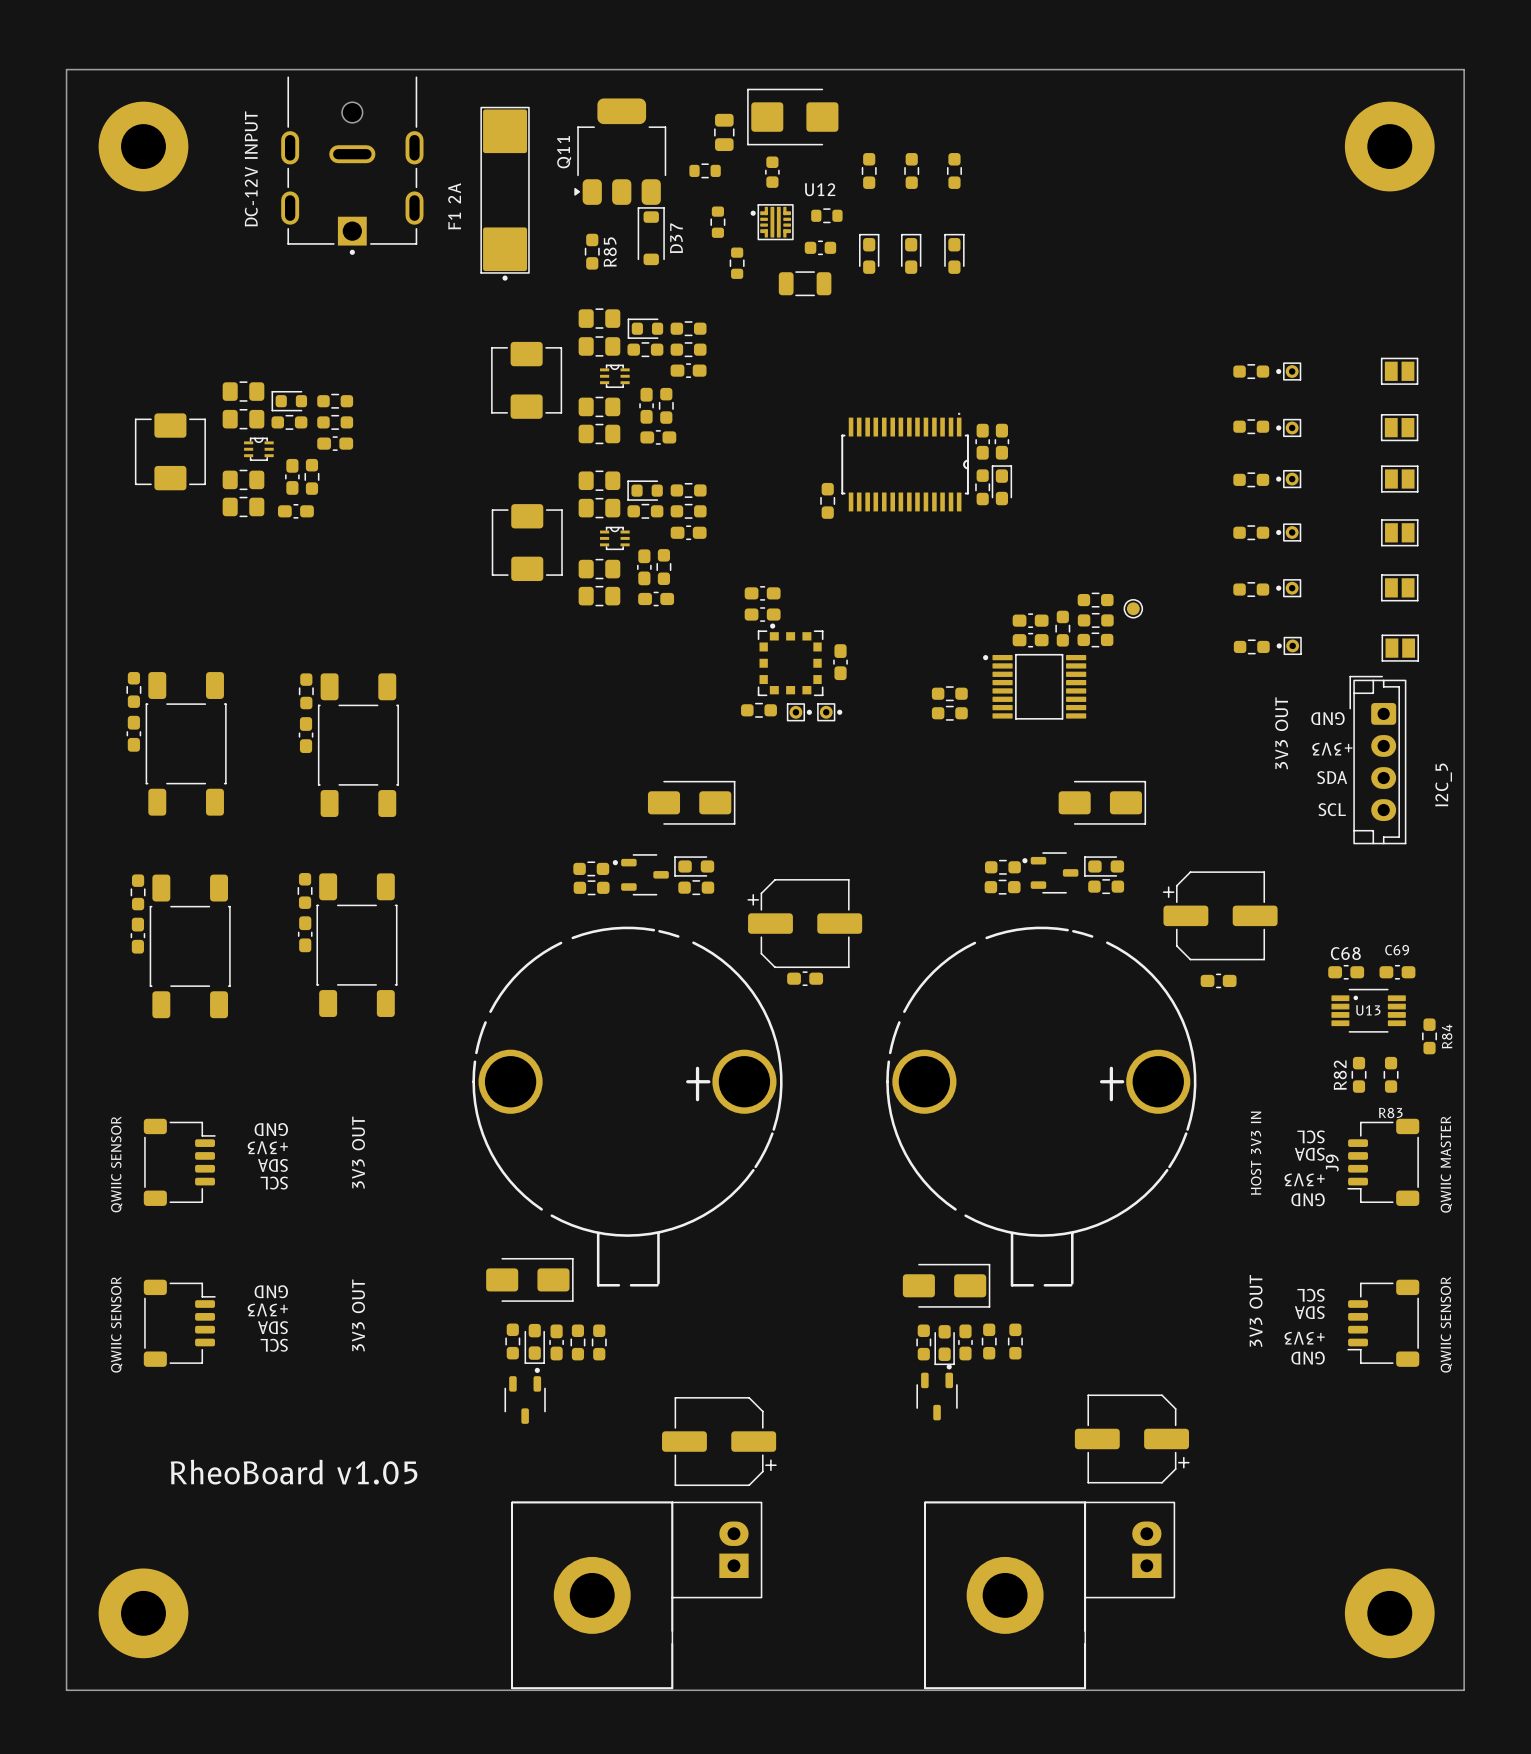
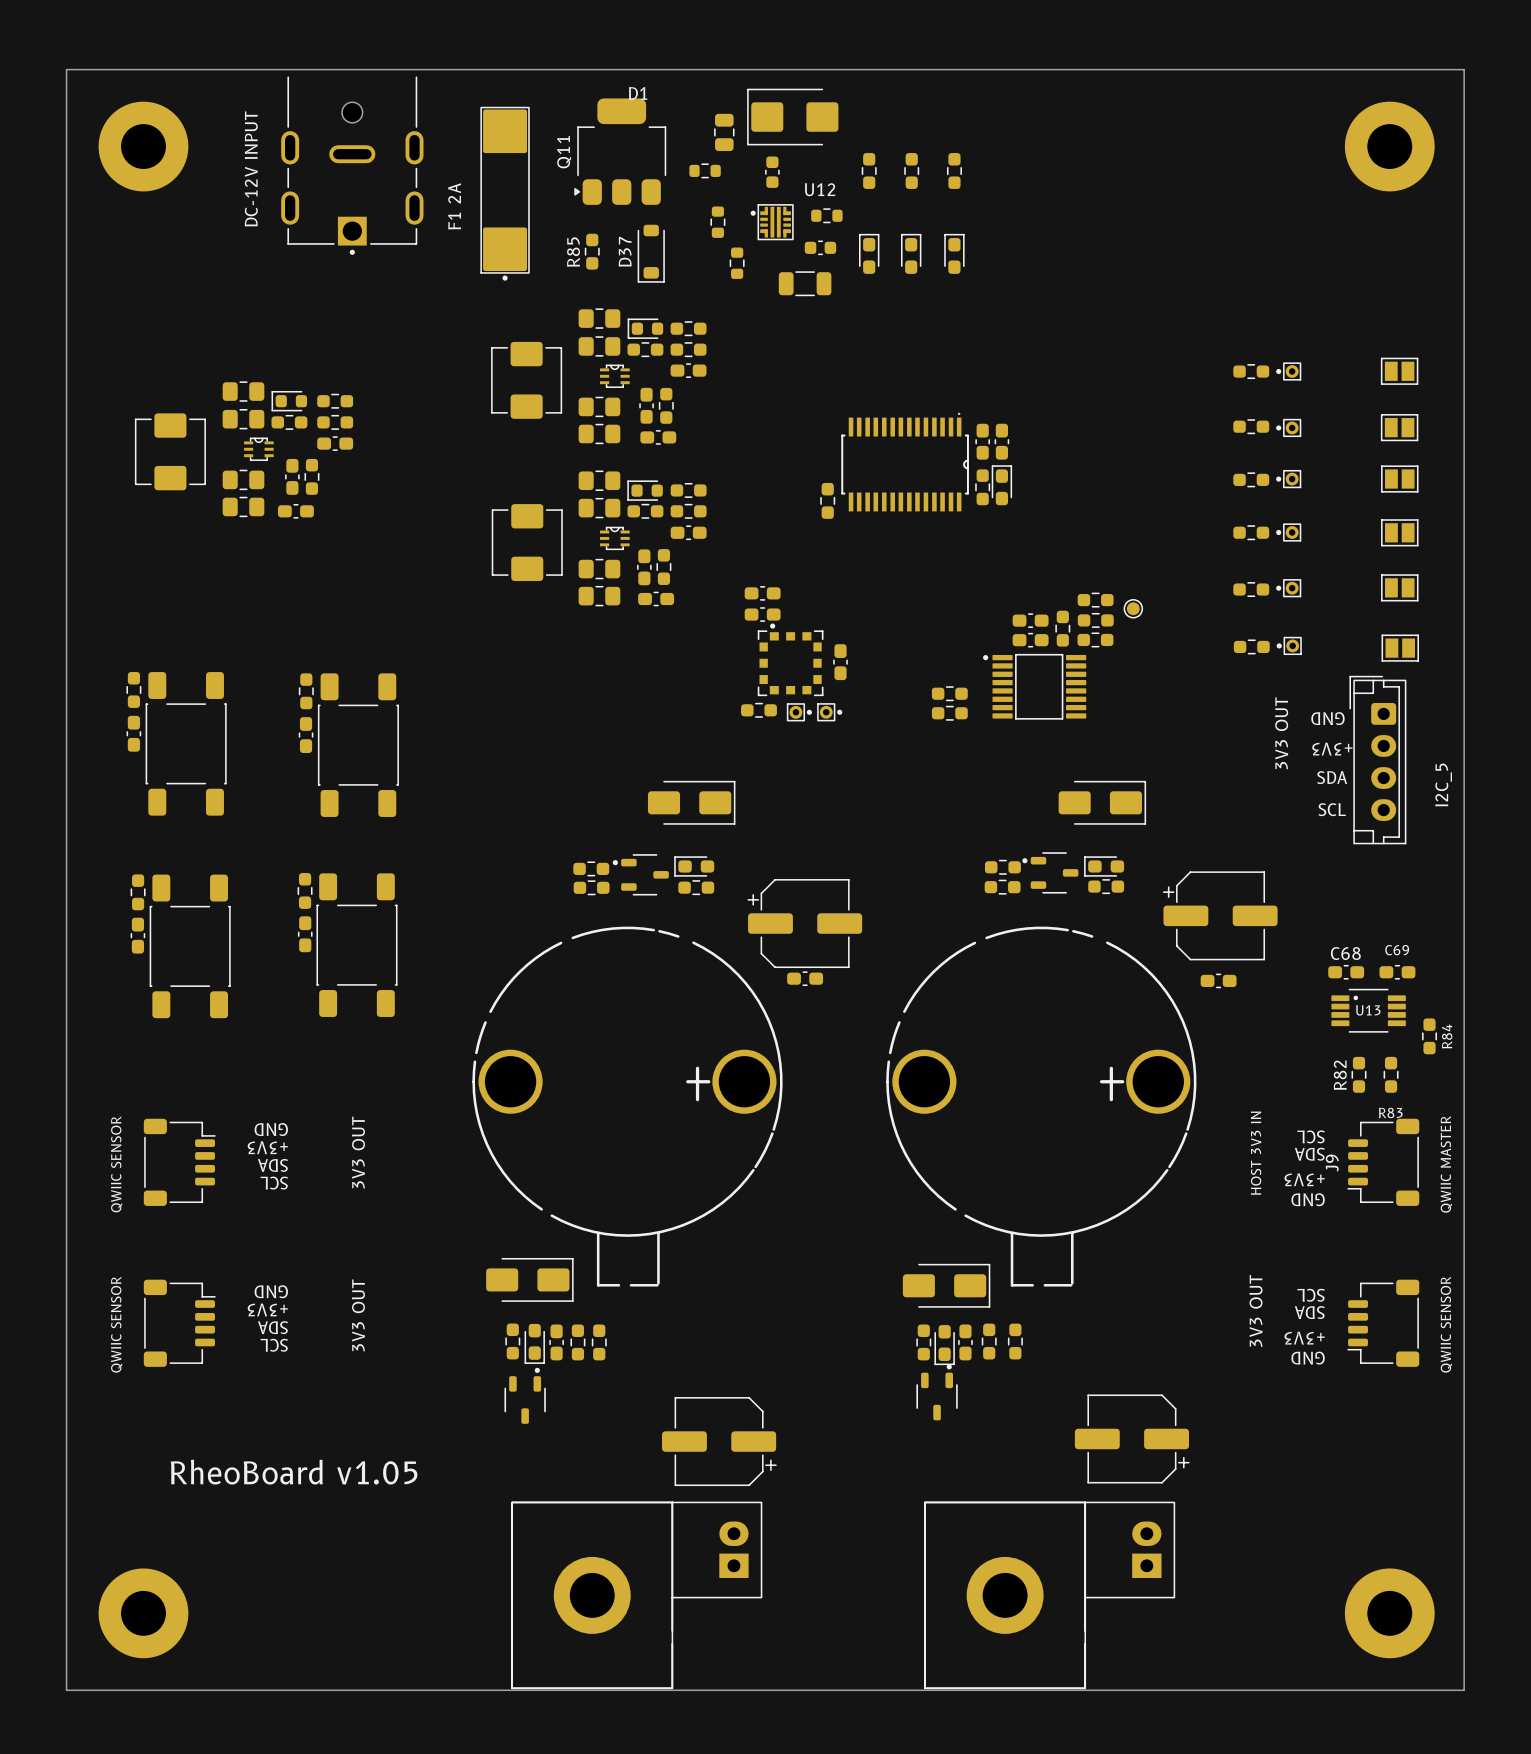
text: none -> D1 (638, 93)
D37 rotation: 0° (651, 236) -> 180° (651, 253)
R85 name position: R85 (610, 252) -> R85 (573, 252)

